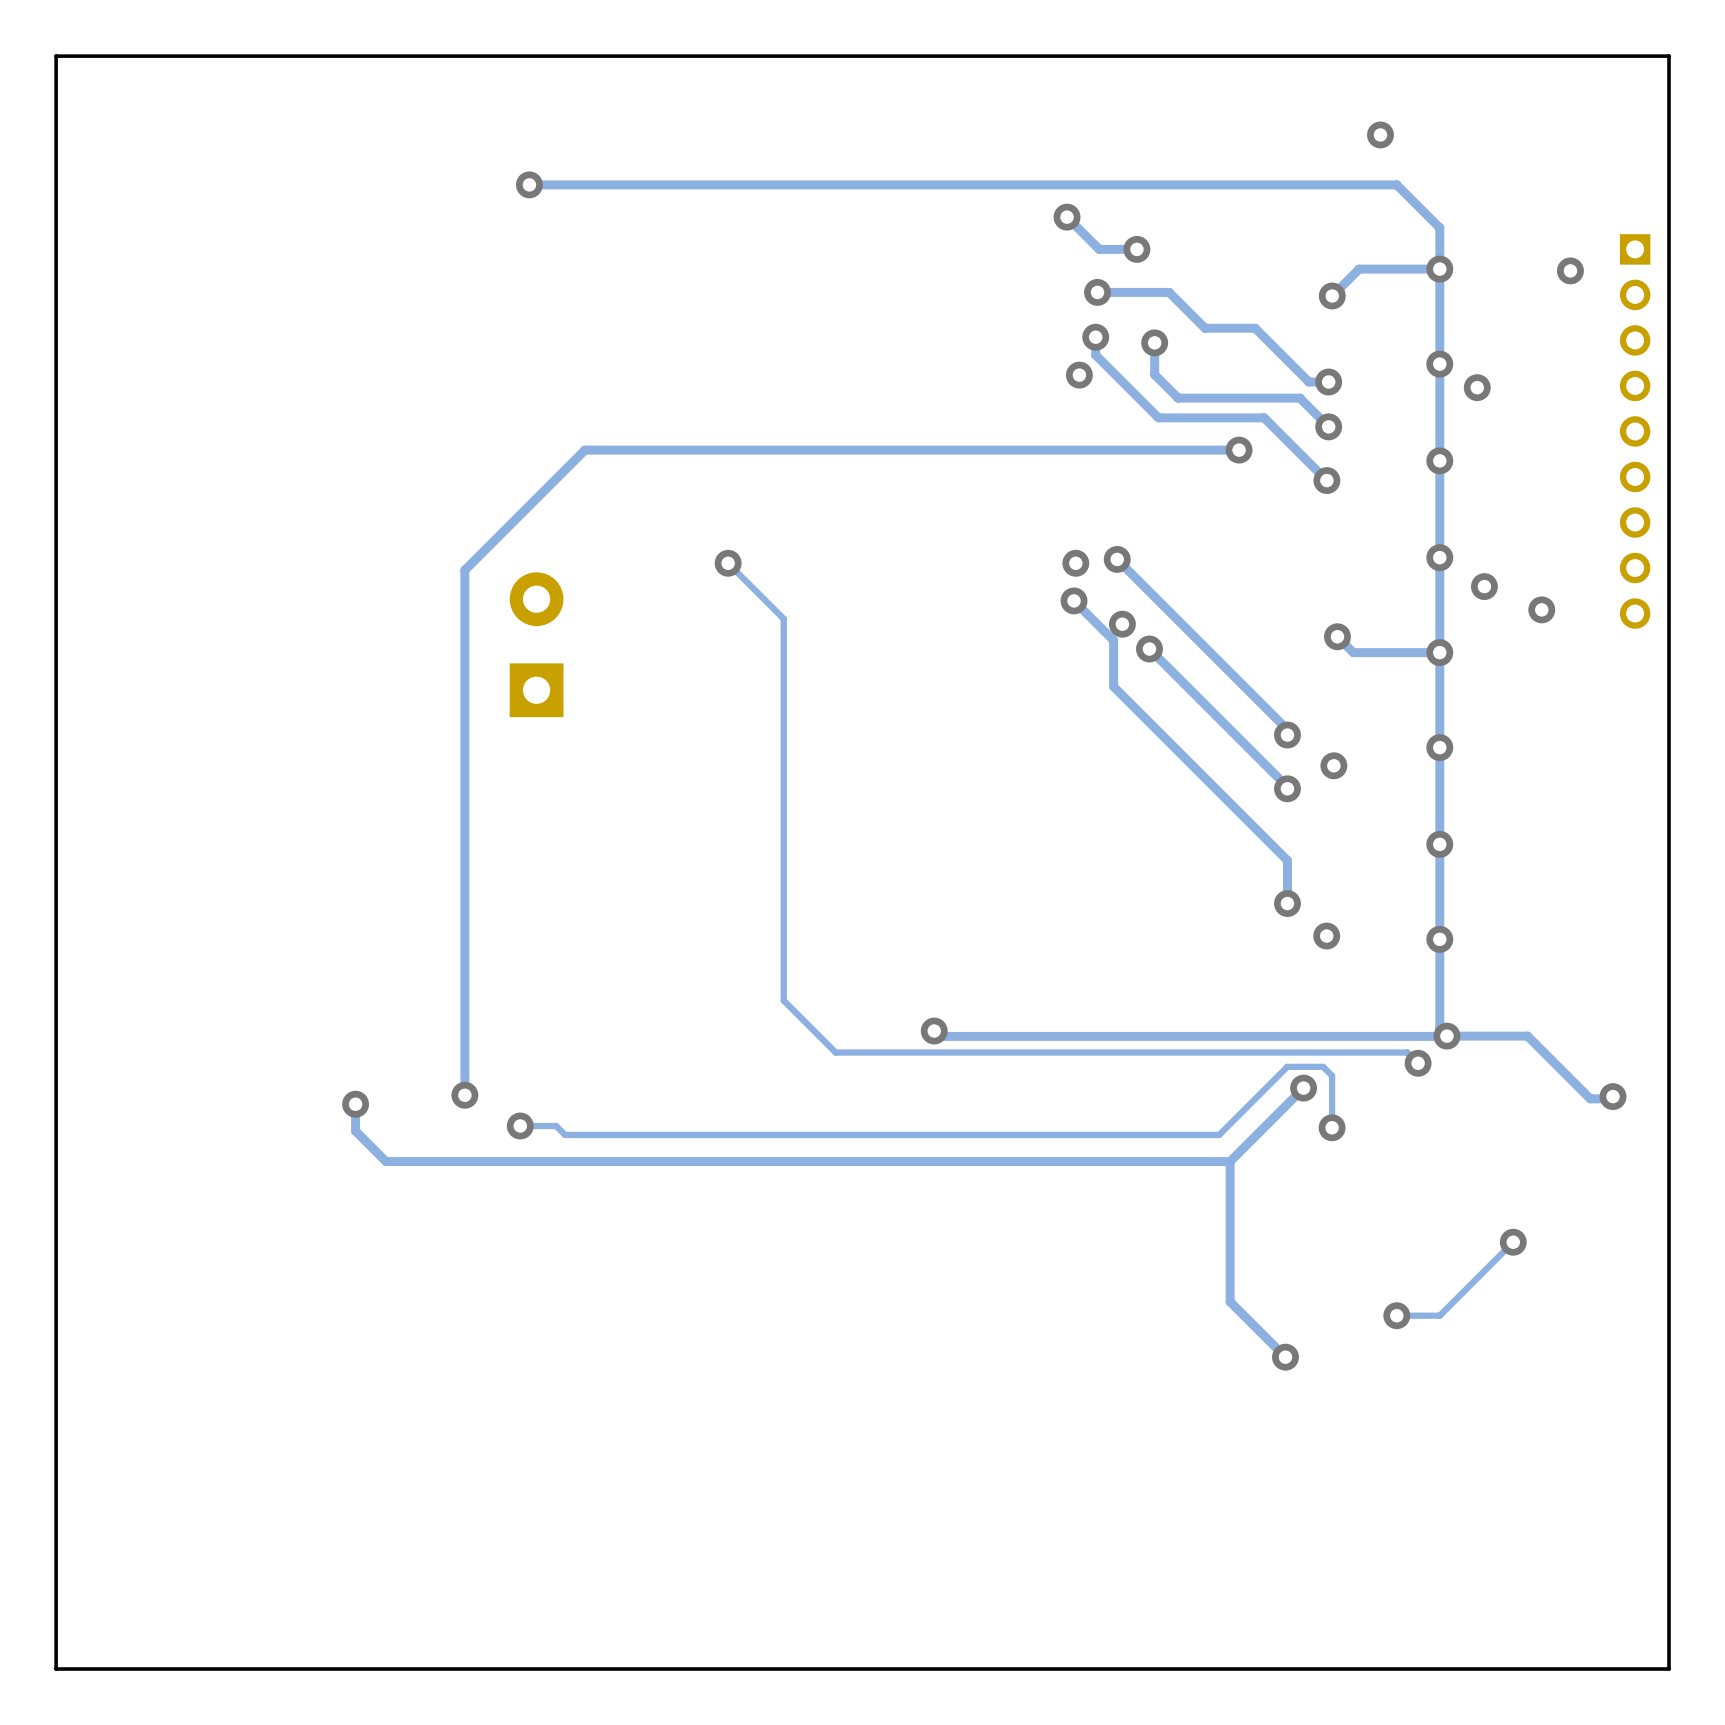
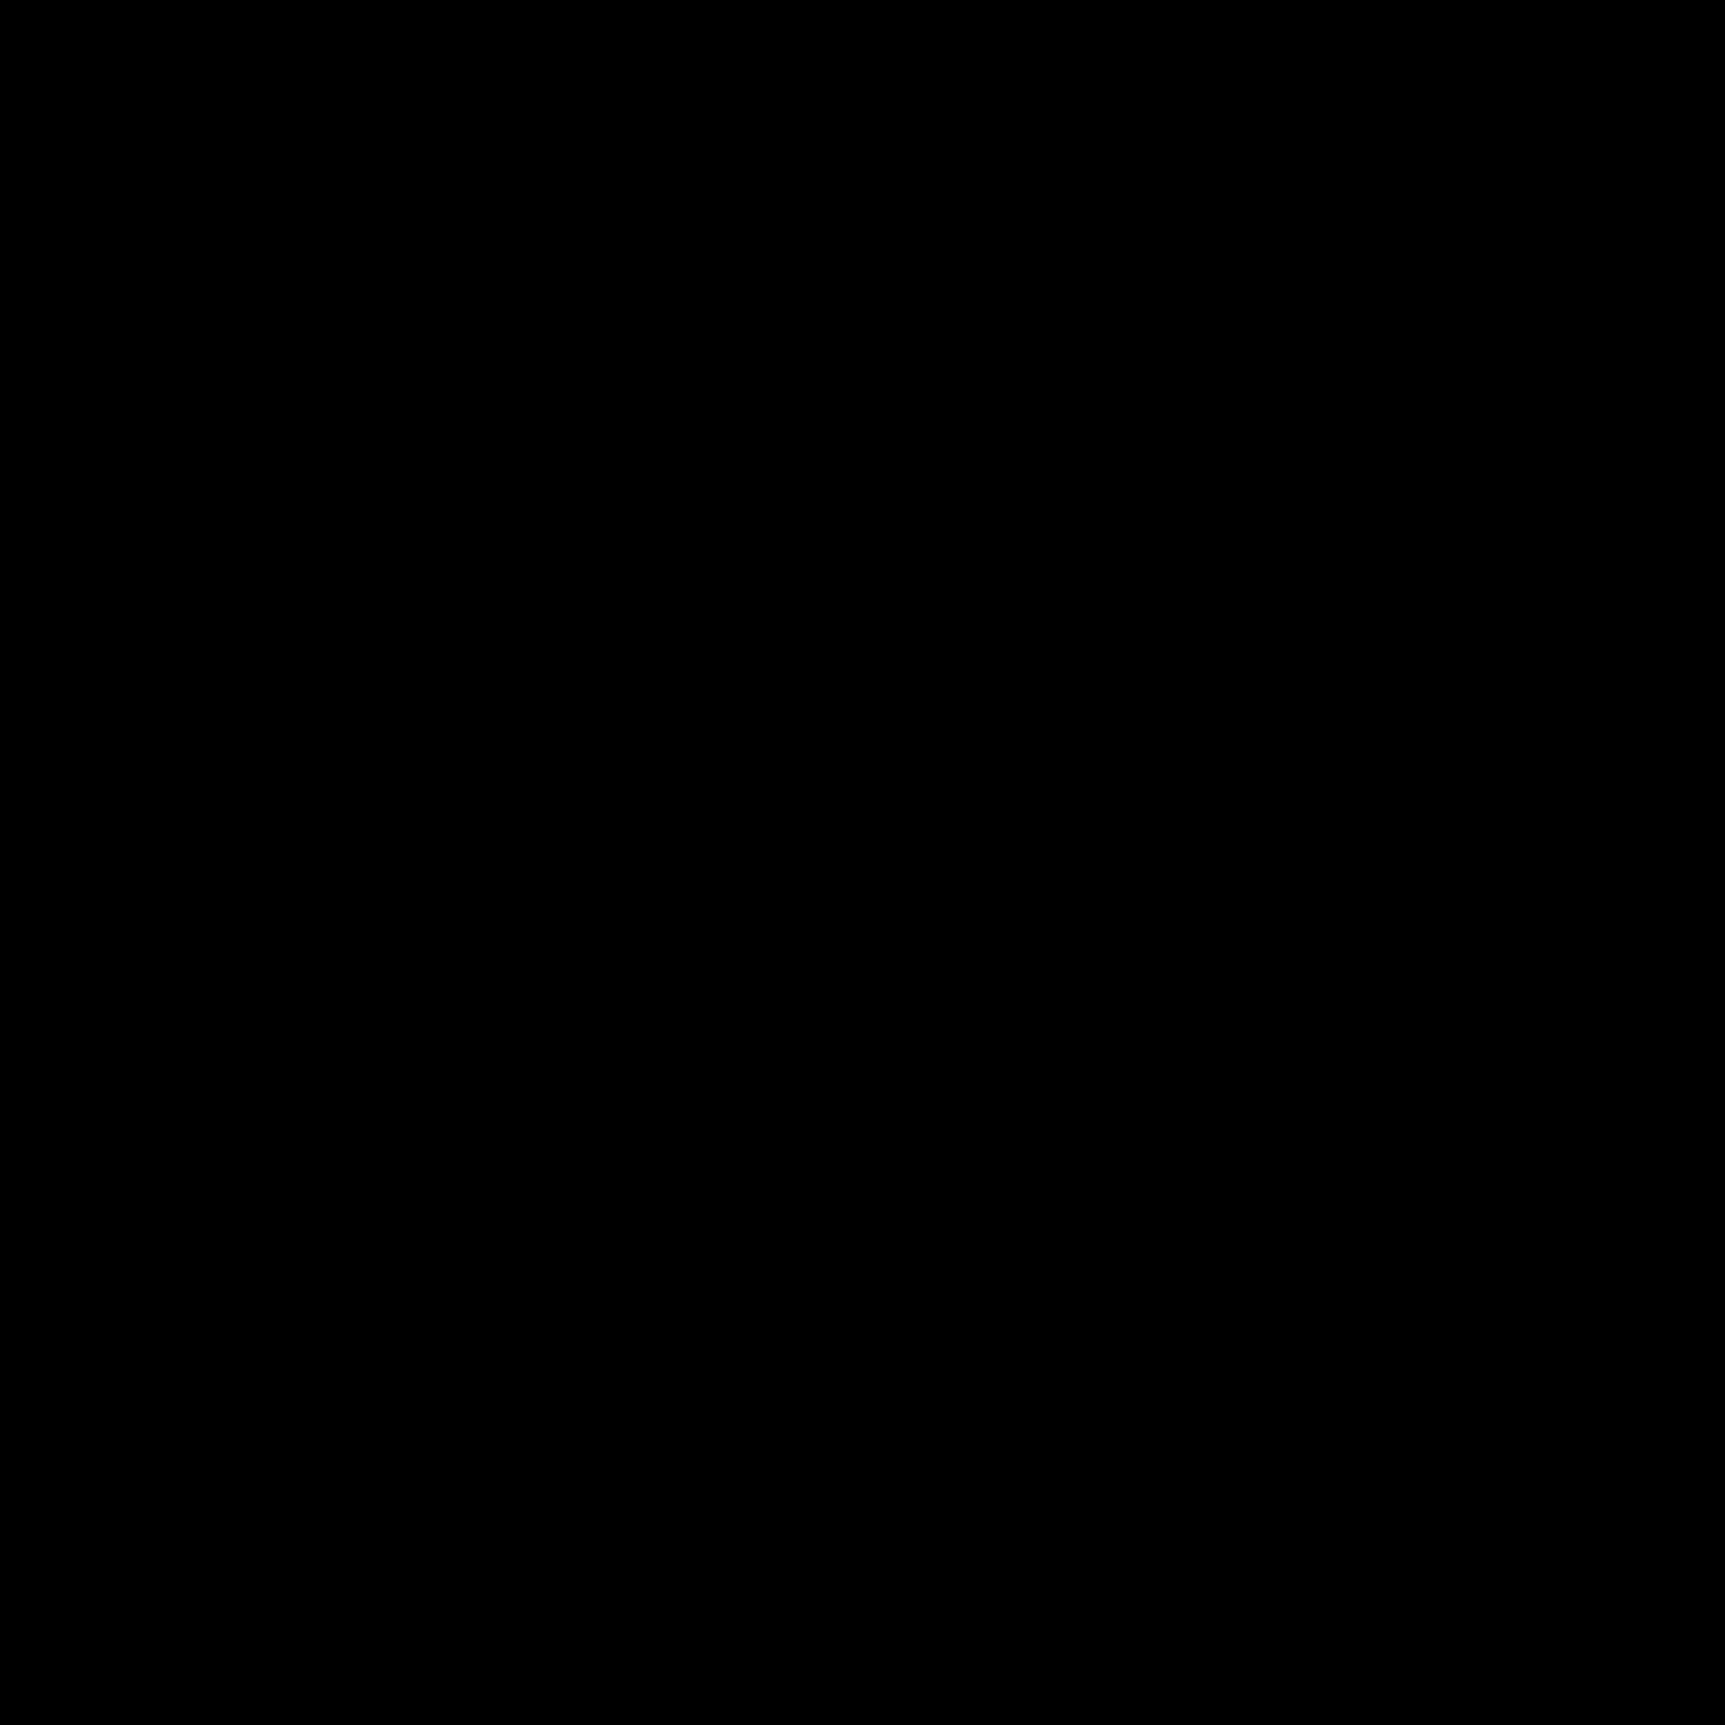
board edge: (1669, 56) (56, 56) (56, 1669) (1669, 1669) (1669, 56) -> none
via: (1380, 134) -> none
track: (529, 184) (1396, 184) (1439, 227) (1439, 1028) (1446, 1036) -> none
via: (529, 184) -> none
track: (1067, 217) (1099, 249) (1136, 249) -> none
via: (1067, 217) -> none
via: (1136, 249) -> none
track: (1439, 269) (1359, 269) (1332, 295) -> none
via: (1439, 269) -> none
via: (1570, 270) -> none
track: (1097, 292) (1169, 292) (1205, 328) (1255, 328) (1308, 382) (1328, 382) -> none
via: (1097, 292) -> none
via: (1332, 295) -> none
track: (1095, 337) (1095, 355) (1158, 417) (1264, 417) (1326, 480) -> none
via: (1095, 337) -> none
track: (1154, 342) (1154, 374) (1178, 398) (1299, 398) (1328, 426) -> none
via: (1154, 342) -> none
via: (1439, 364) -> none
via: (1079, 375) -> none
via: (1328, 382) -> none
via: (1477, 387) -> none
via: (1328, 426) -> none
part: (1635, 431) -> none
track: (1239, 450) (584, 450) (464, 570) (464, 1095) -> none
via: (1239, 450) -> none
via: (1439, 460) -> none
via: (1326, 480) -> none
via: (1439, 557) -> none
track: (1117, 559) (1287, 729) (1287, 735) -> none
via: (1117, 559) -> none
track: (728, 563) (783, 618) (783, 1000) (835, 1052) (1407, 1052) (1418, 1063) -> none
via: (728, 563) -> none
via: (1075, 563) -> none
via: (1484, 586) -> none
track: (1074, 600) (1113, 640) (1113, 686) (1287, 860) (1287, 903) -> none
via: (1074, 600) -> none
via: (1541, 609) -> none
via: (1122, 624) -> none
track: (1337, 636) (1353, 652) (1439, 652) -> none
via: (1337, 636) -> none
part: (536, 644) -> none
track: (1149, 649) (1287, 788) -> none
via: (1149, 649) -> none
via: (1439, 652) -> none
via: (1287, 735) -> none
via: (1439, 747) -> none
via: (1333, 765) -> none
via: (1287, 788) -> none
via: (1439, 844) -> none
via: (1287, 903) -> none
via: (1326, 936) -> none
via: (1439, 939) -> none
track: (934, 1031) (939, 1036) (1446, 1036) -> none
via: (934, 1031) -> none
track: (1446, 1036) (1527, 1036) (1590, 1098) (1610, 1098) (1613, 1096) -> none
via: (1446, 1036) -> none
via: (1418, 1063) -> none
track: (1303, 1088) (1230, 1161) -> none
via: (1303, 1088) -> none
via: (464, 1095) -> none
via: (1613, 1096) -> none
track: (355, 1104) (355, 1131) (386, 1161) (1230, 1161) -> none
via: (355, 1104) -> none
track: (520, 1126) (556, 1126) (565, 1134) (1219, 1134) (1287, 1066) (1323, 1066) (1332, 1075) (1332, 1127) -> none
via: (520, 1126) -> none
via: (1332, 1127) -> none
track: (1230, 1161) (1230, 1301) (1285, 1357) -> none
track: (1513, 1242) (1439, 1315) (1396, 1315) -> none
via: (1513, 1242) -> none
via: (1396, 1315) -> none
via: (1285, 1357) -> none

